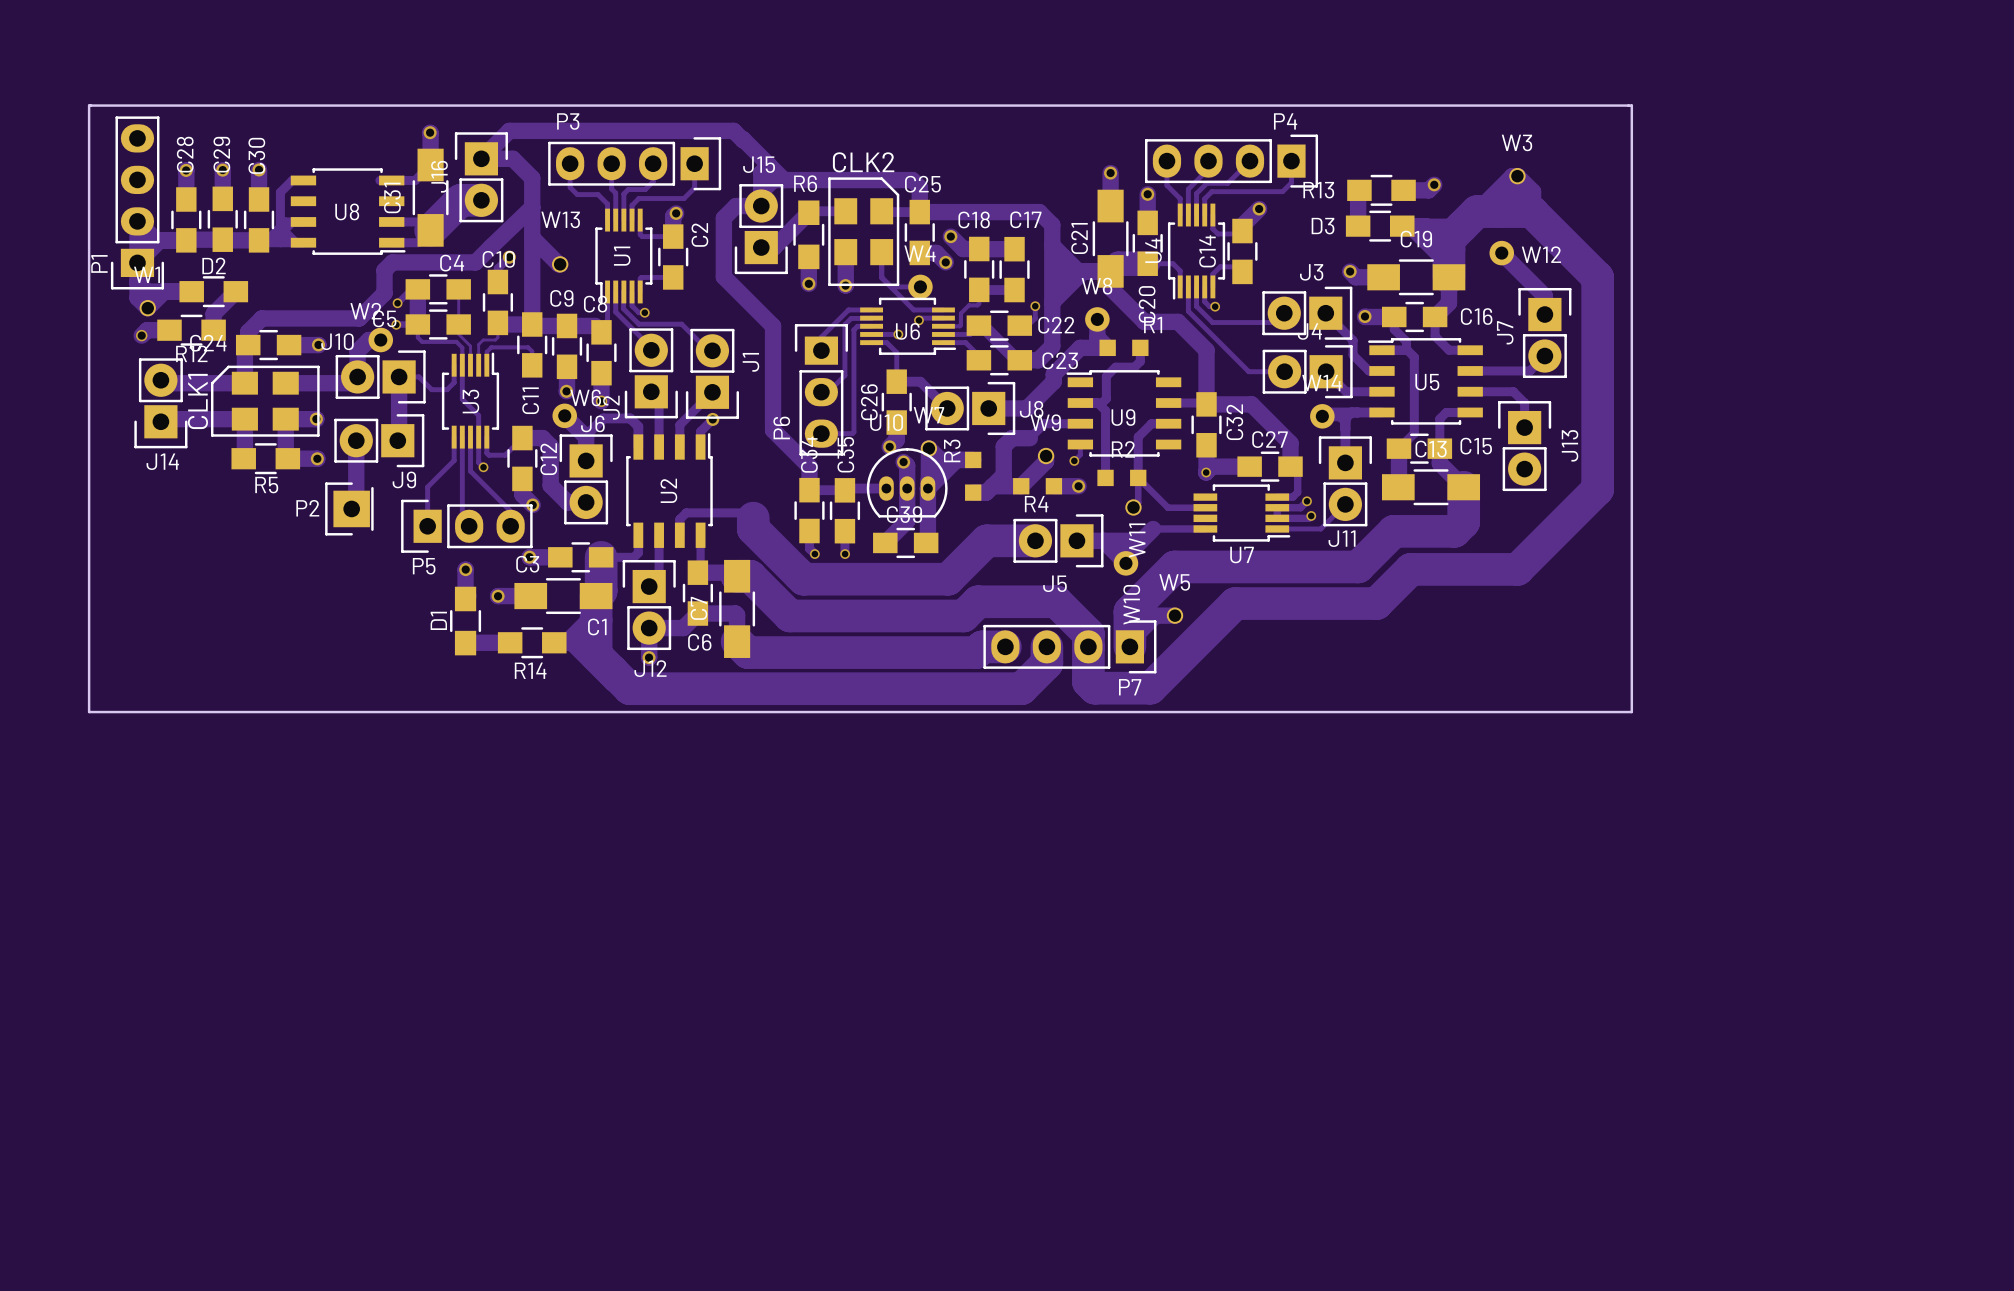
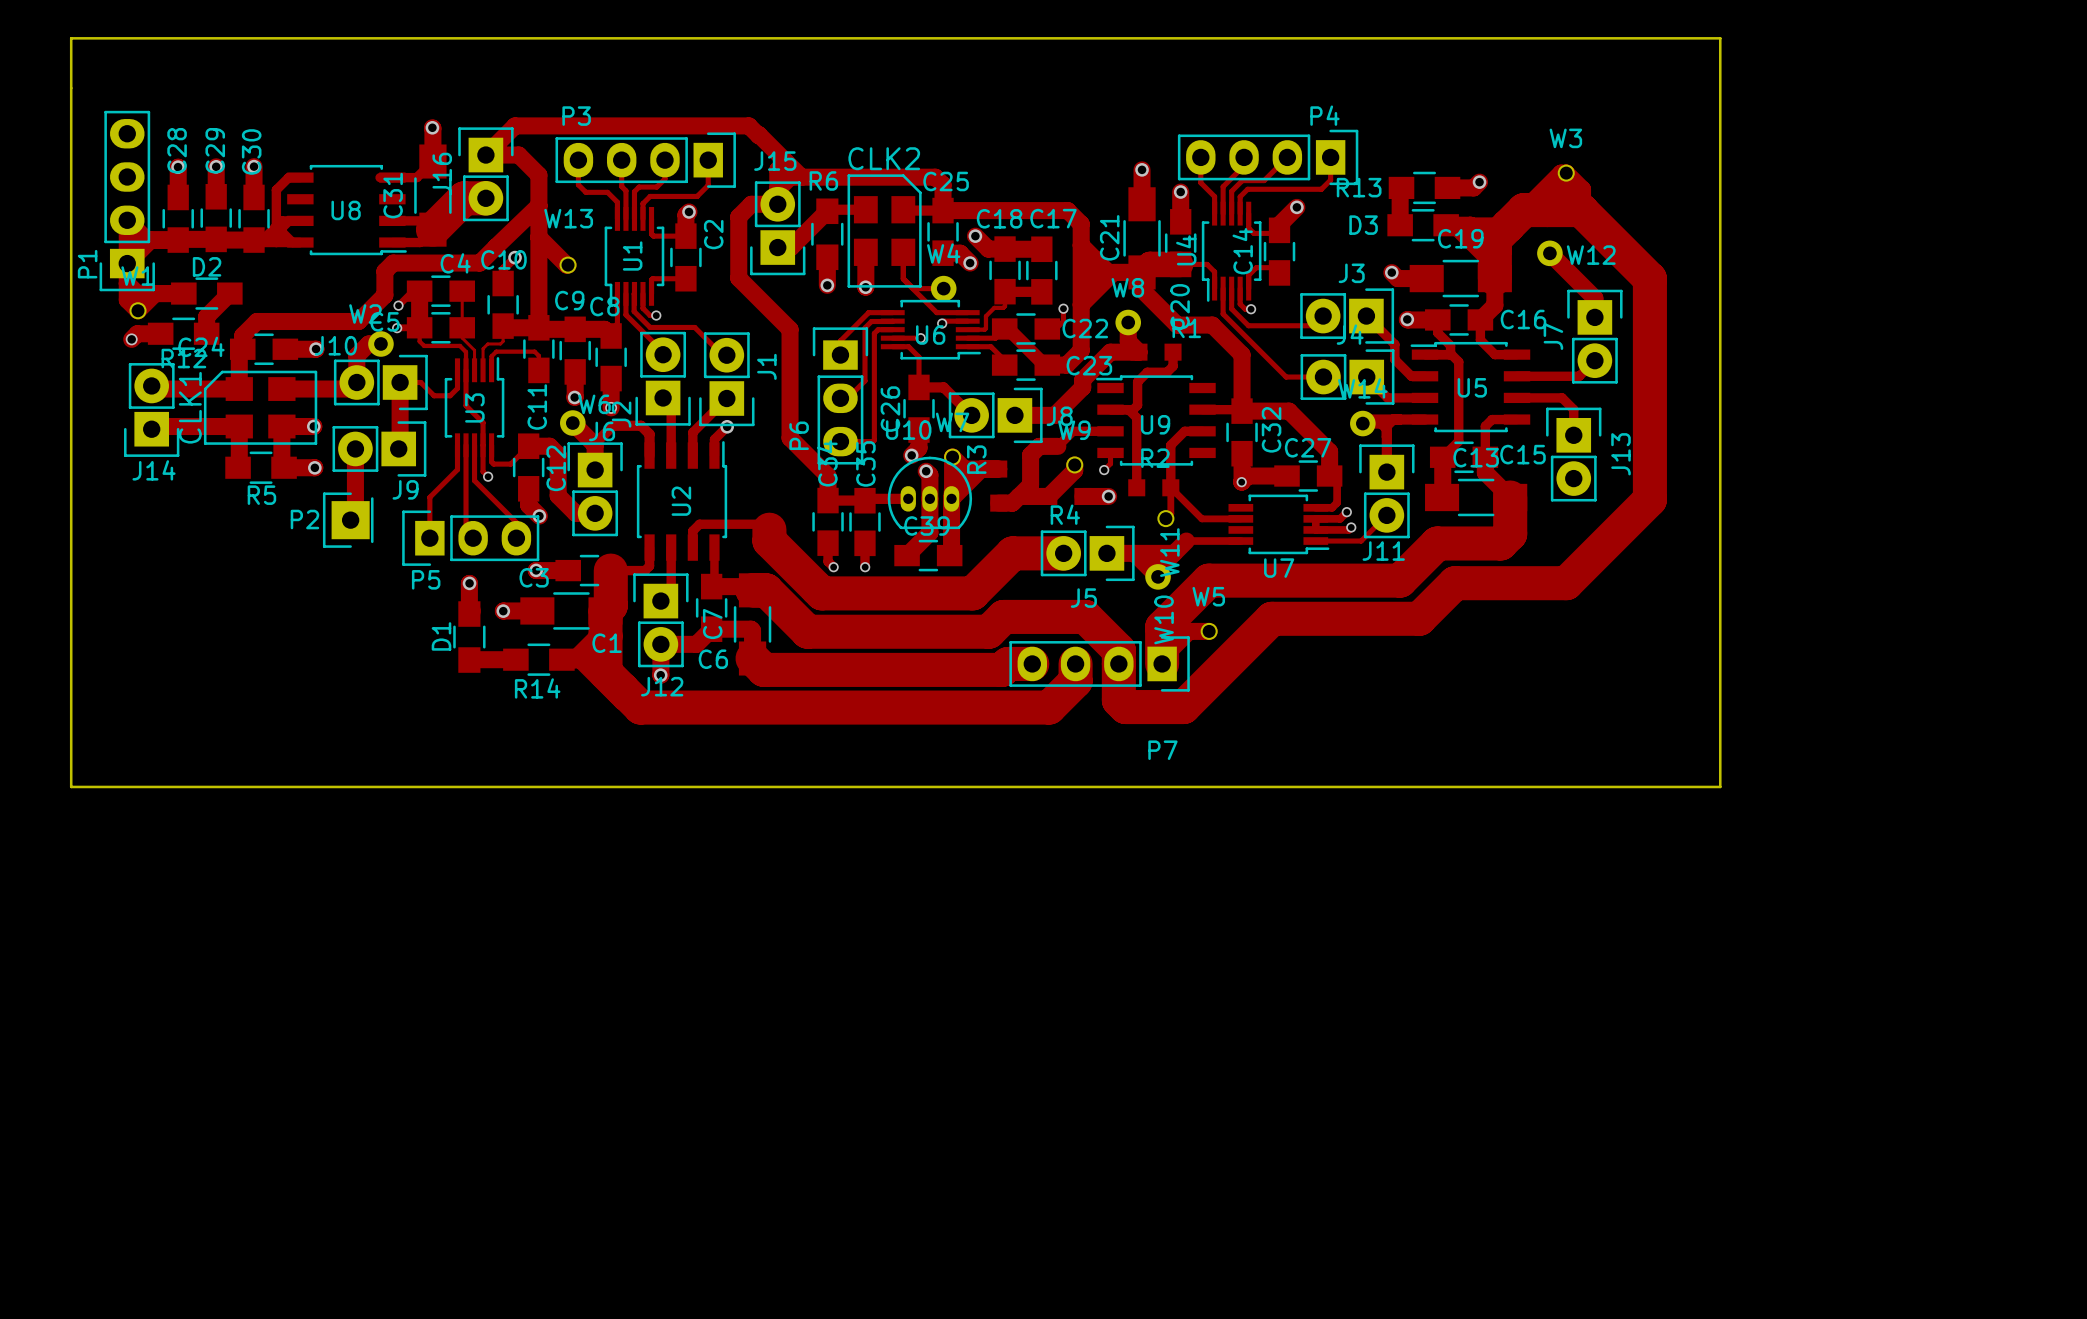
board edge: (89, 105) (1631, 105) (1631, 712) (89, 712) (89, 105) -> (71, 38) (71, 786) (1720, 786) (1720, 38) (71, 38)
P7 name position: P7 (1130, 687) -> P7 (1162, 750)

